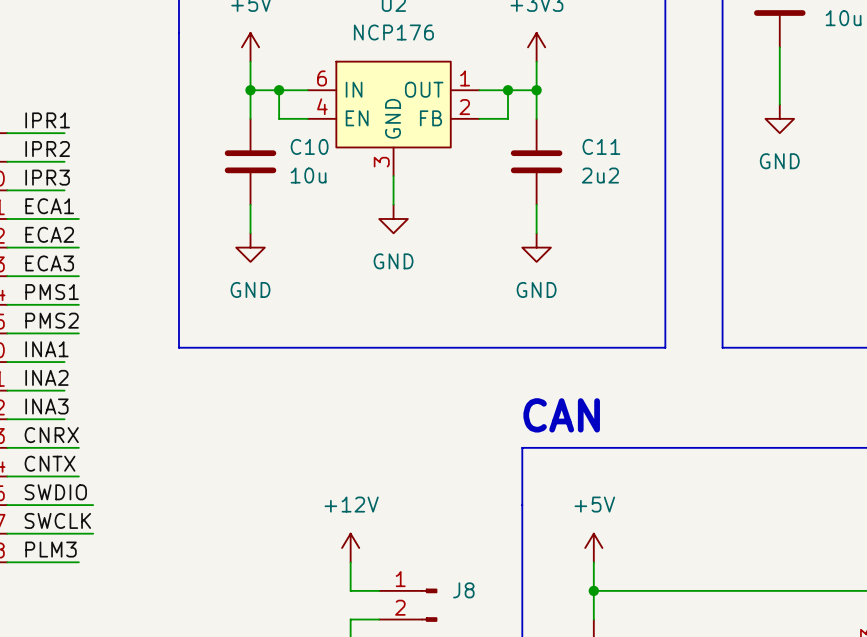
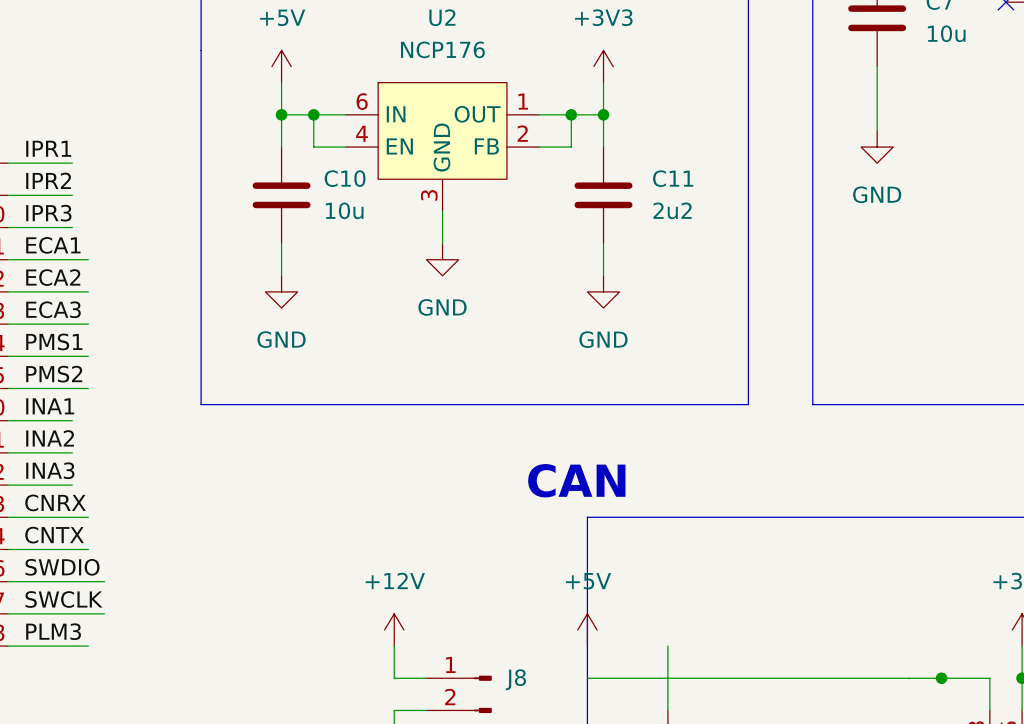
text position: CAN (561, 415) -> CAN (576, 480)
power symbol position: +5V (593, 548) -> +5V (587, 629)
wire: none -> (587, 678) (667, 678)
junction: (593, 590) -> none
junction: none -> (941, 678)

